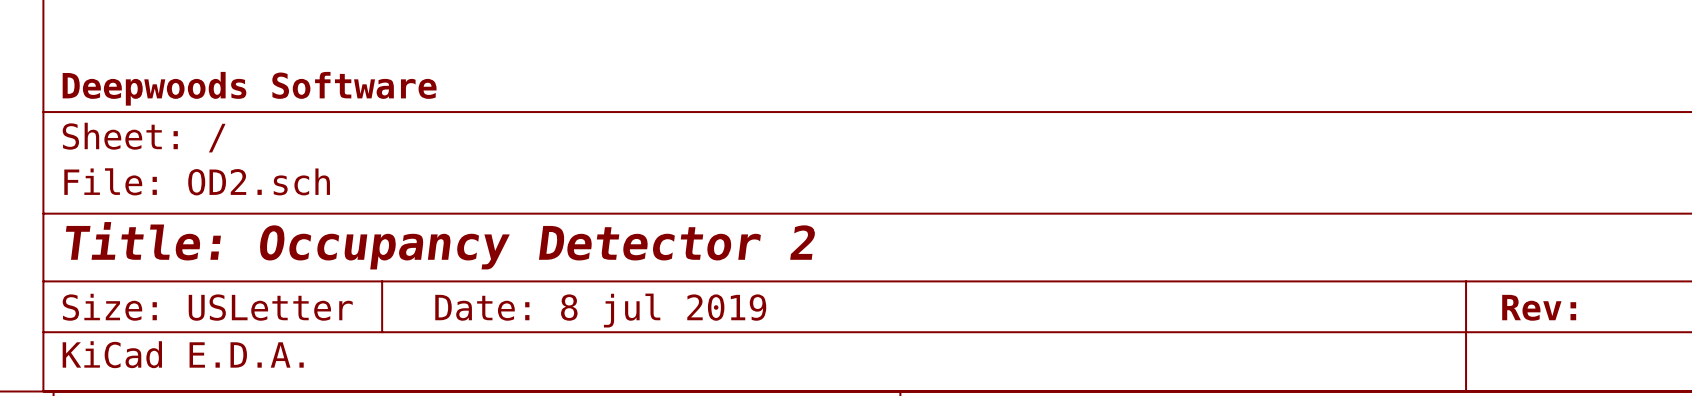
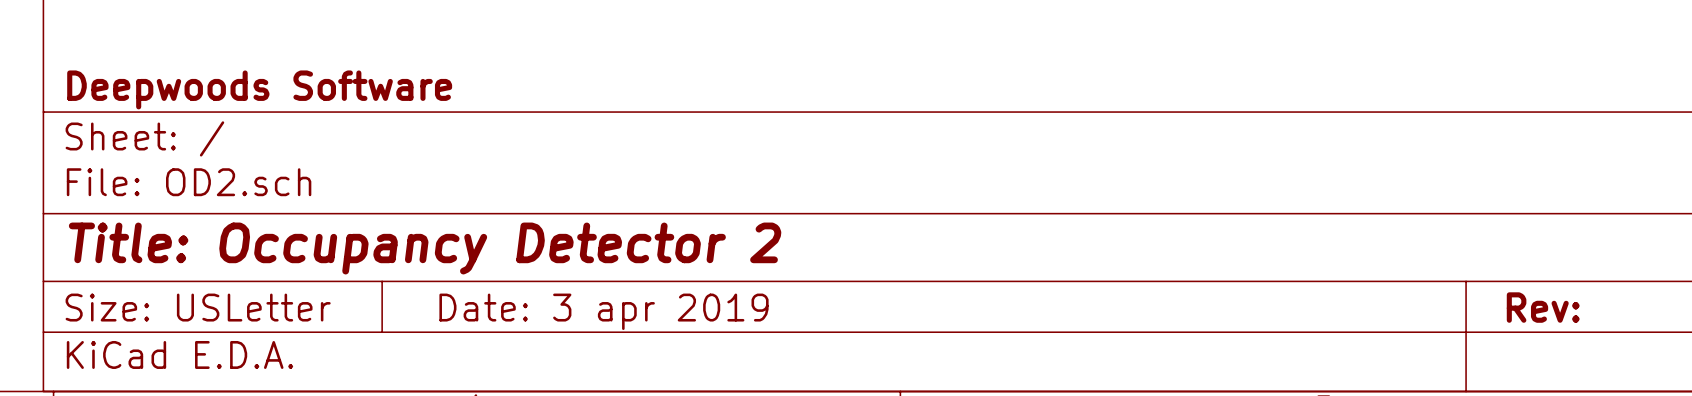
title block: Date: 8 jul 2019 (600, 310) -> Date: 3 apr 2019 (604, 311)

